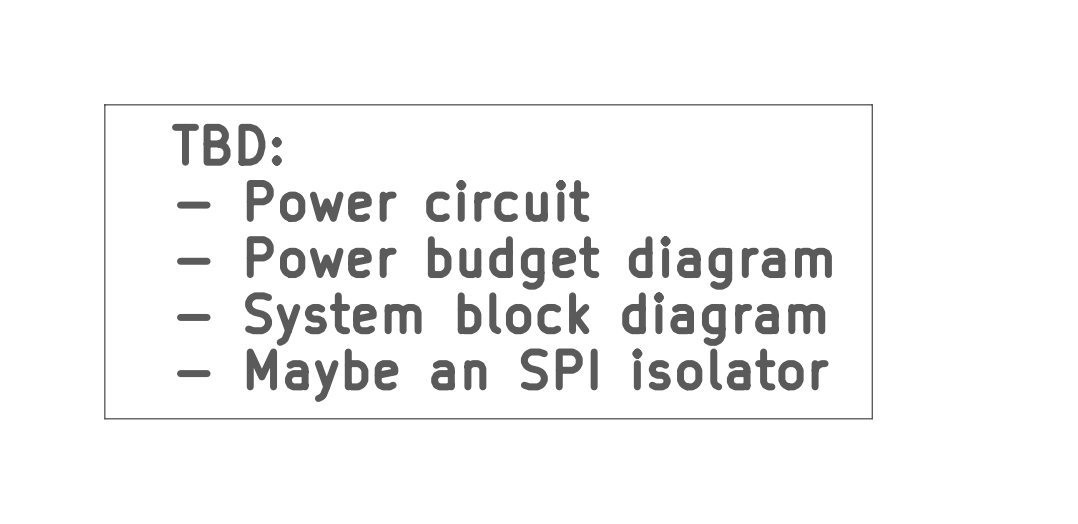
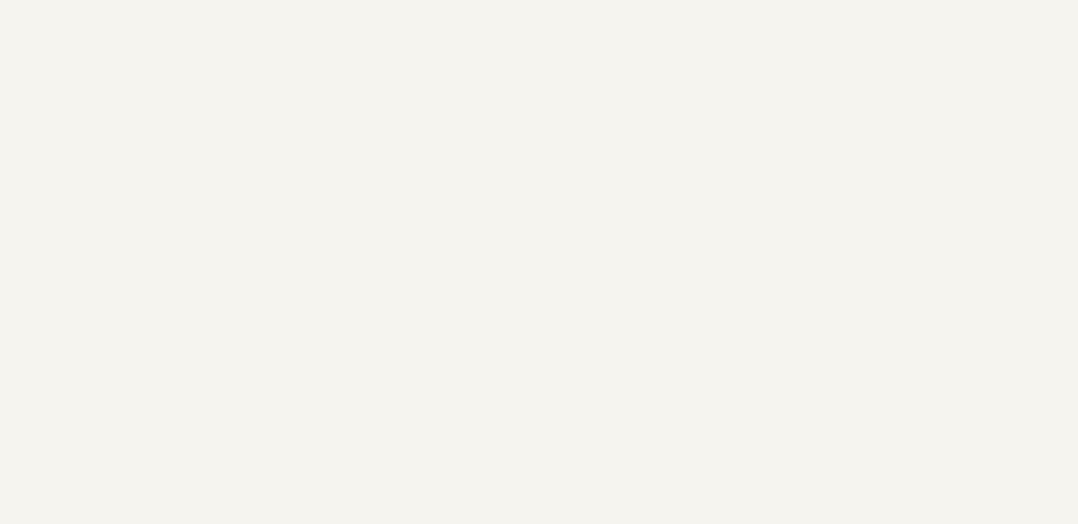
line: (104, 104) (872, 104) (872, 418) (104, 418) (104, 104) -> none
text: TBD: (227, 144) -> none
text: - Power circuit (383, 200) -> none
text: - Power budget diagram (504, 262) -> none
text: - System block diagram (501, 319) -> none
text: - Maybe an SPI isolator (502, 375) -> none

